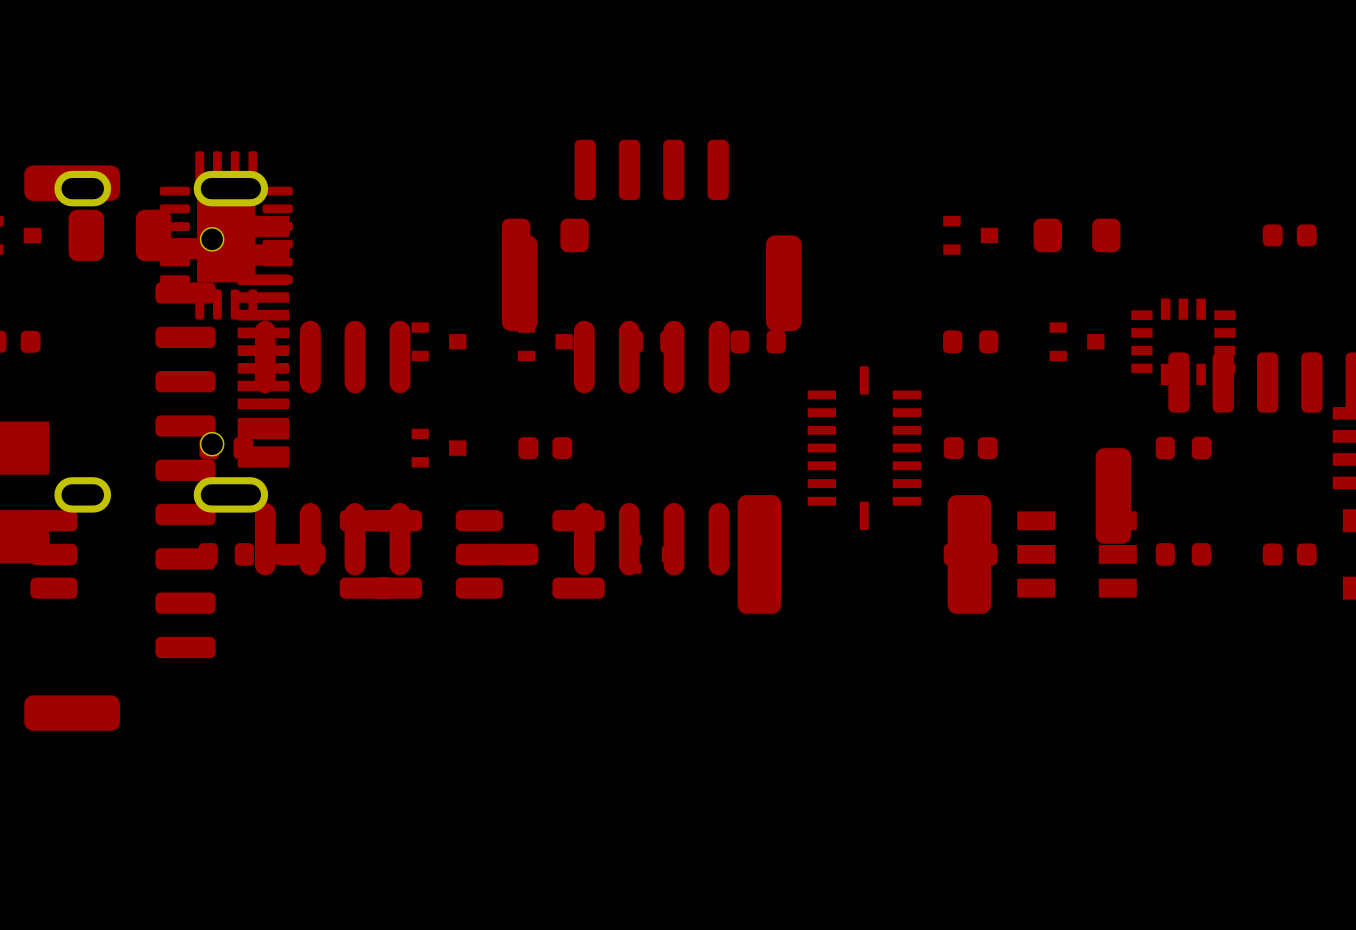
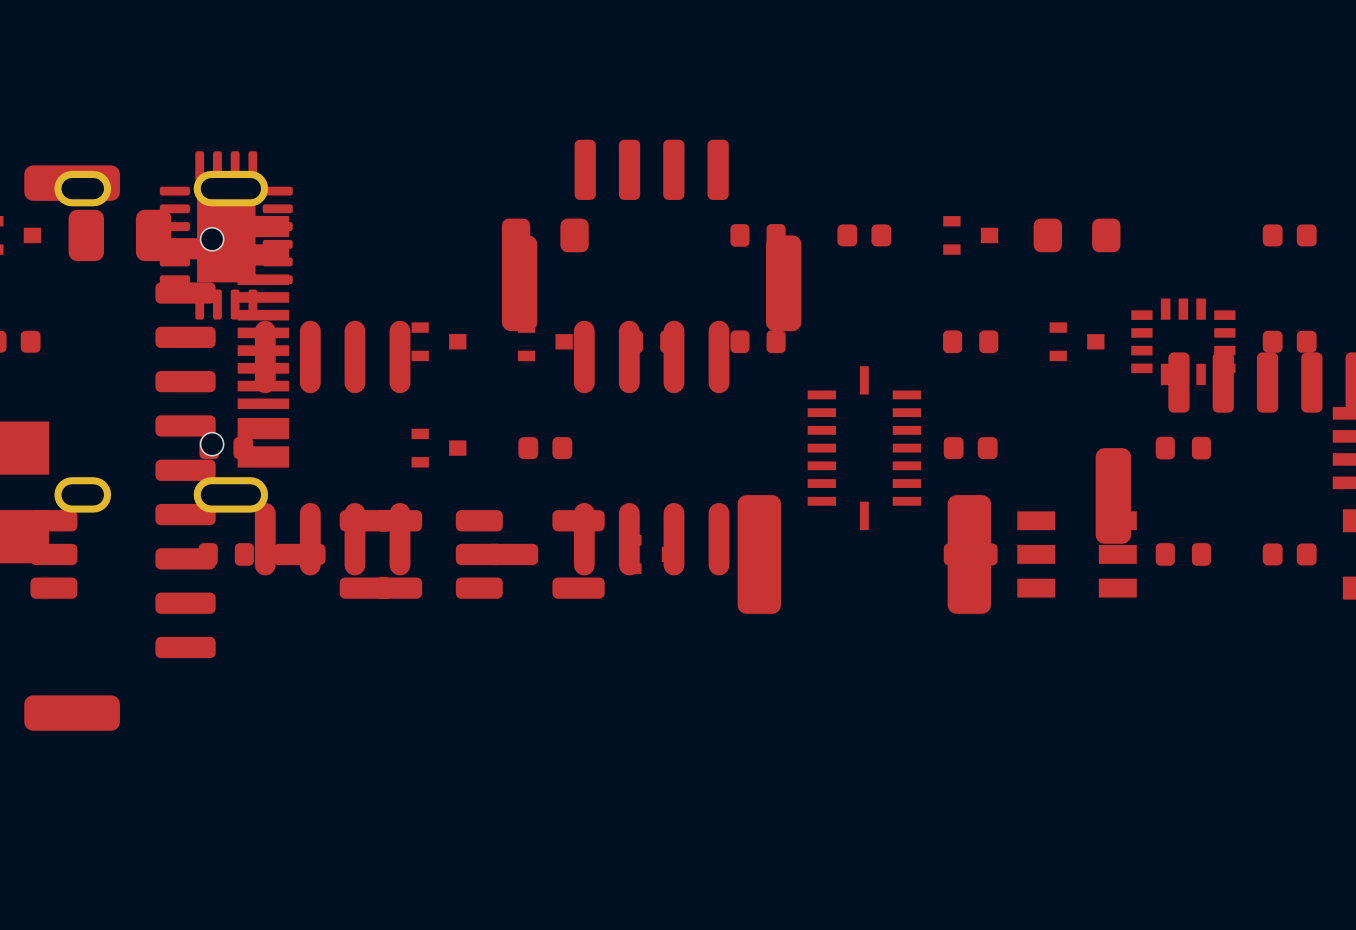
part: none -> (758, 235)
part: none -> (864, 235)
part: none -> (1289, 341)

